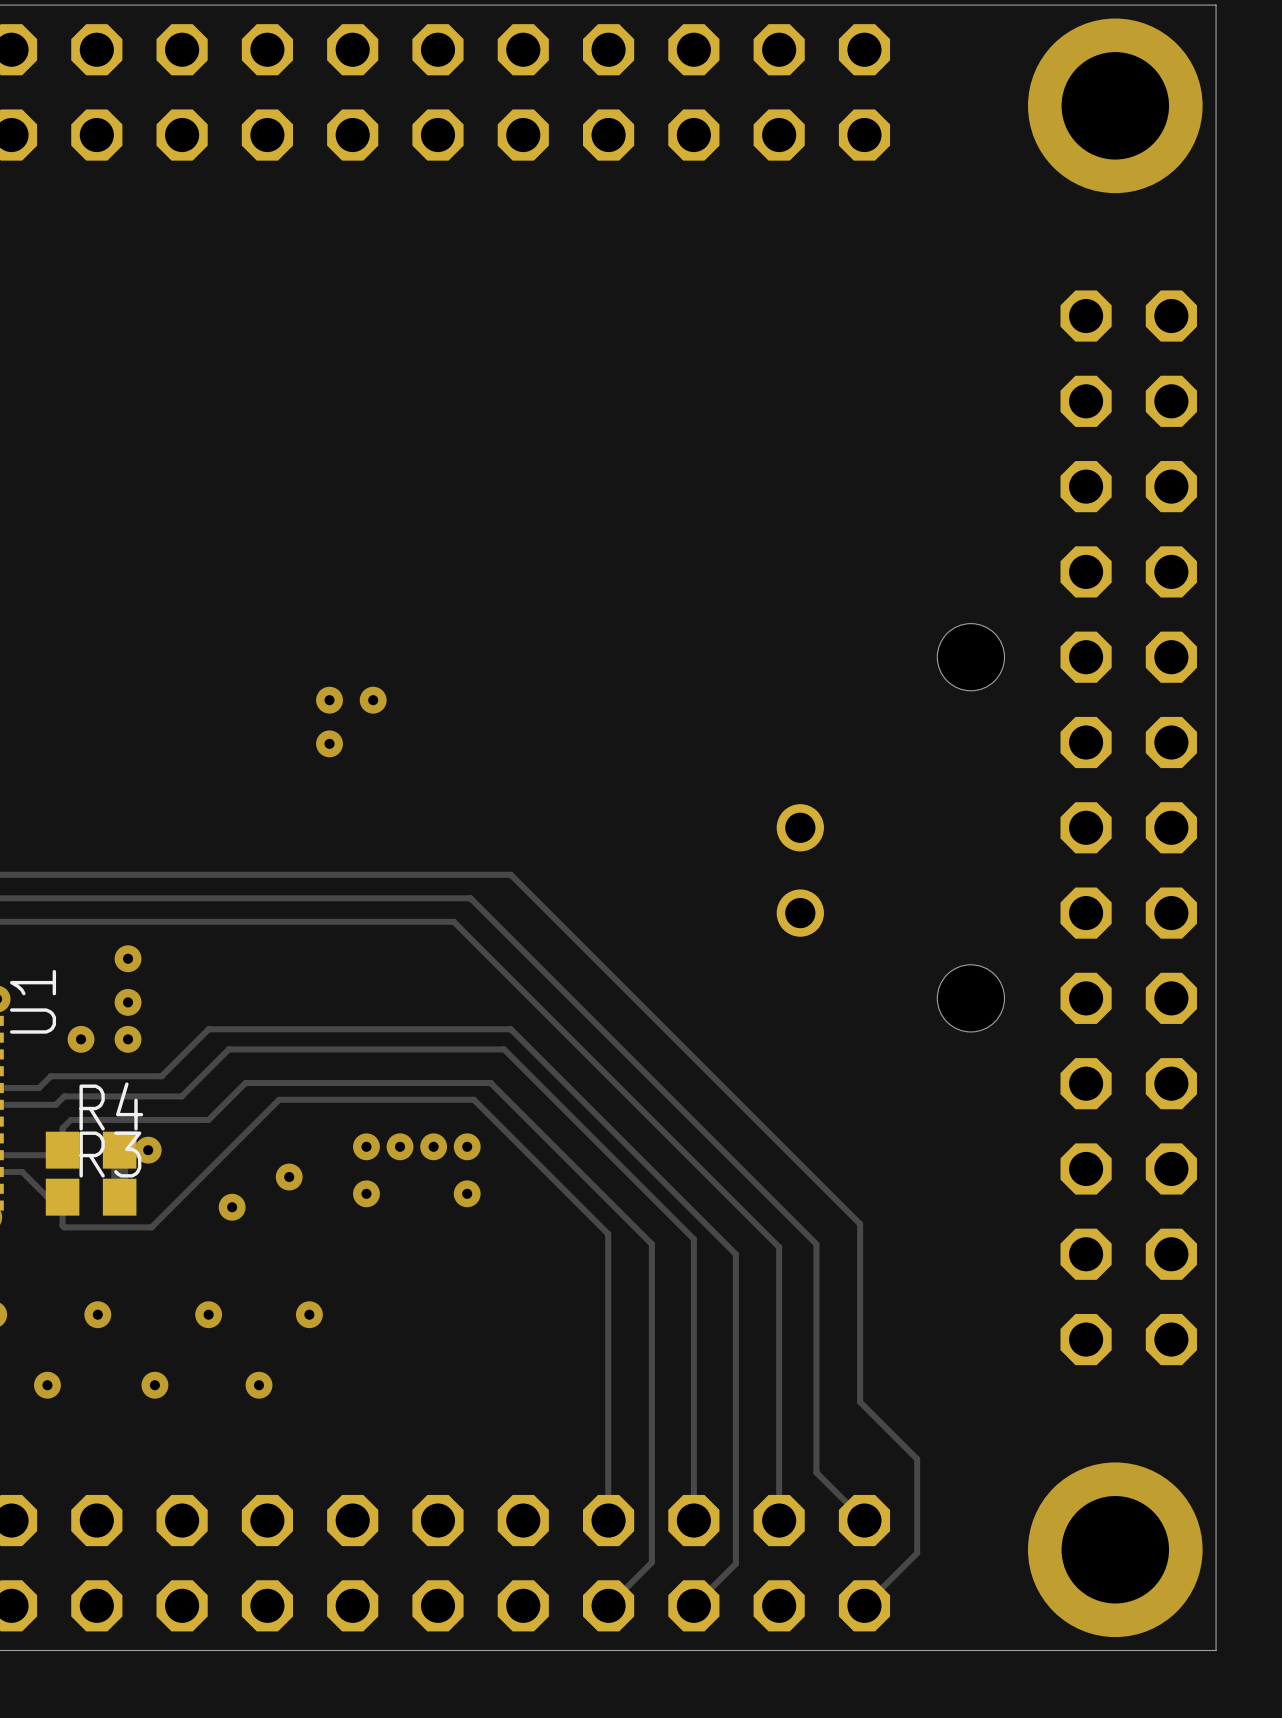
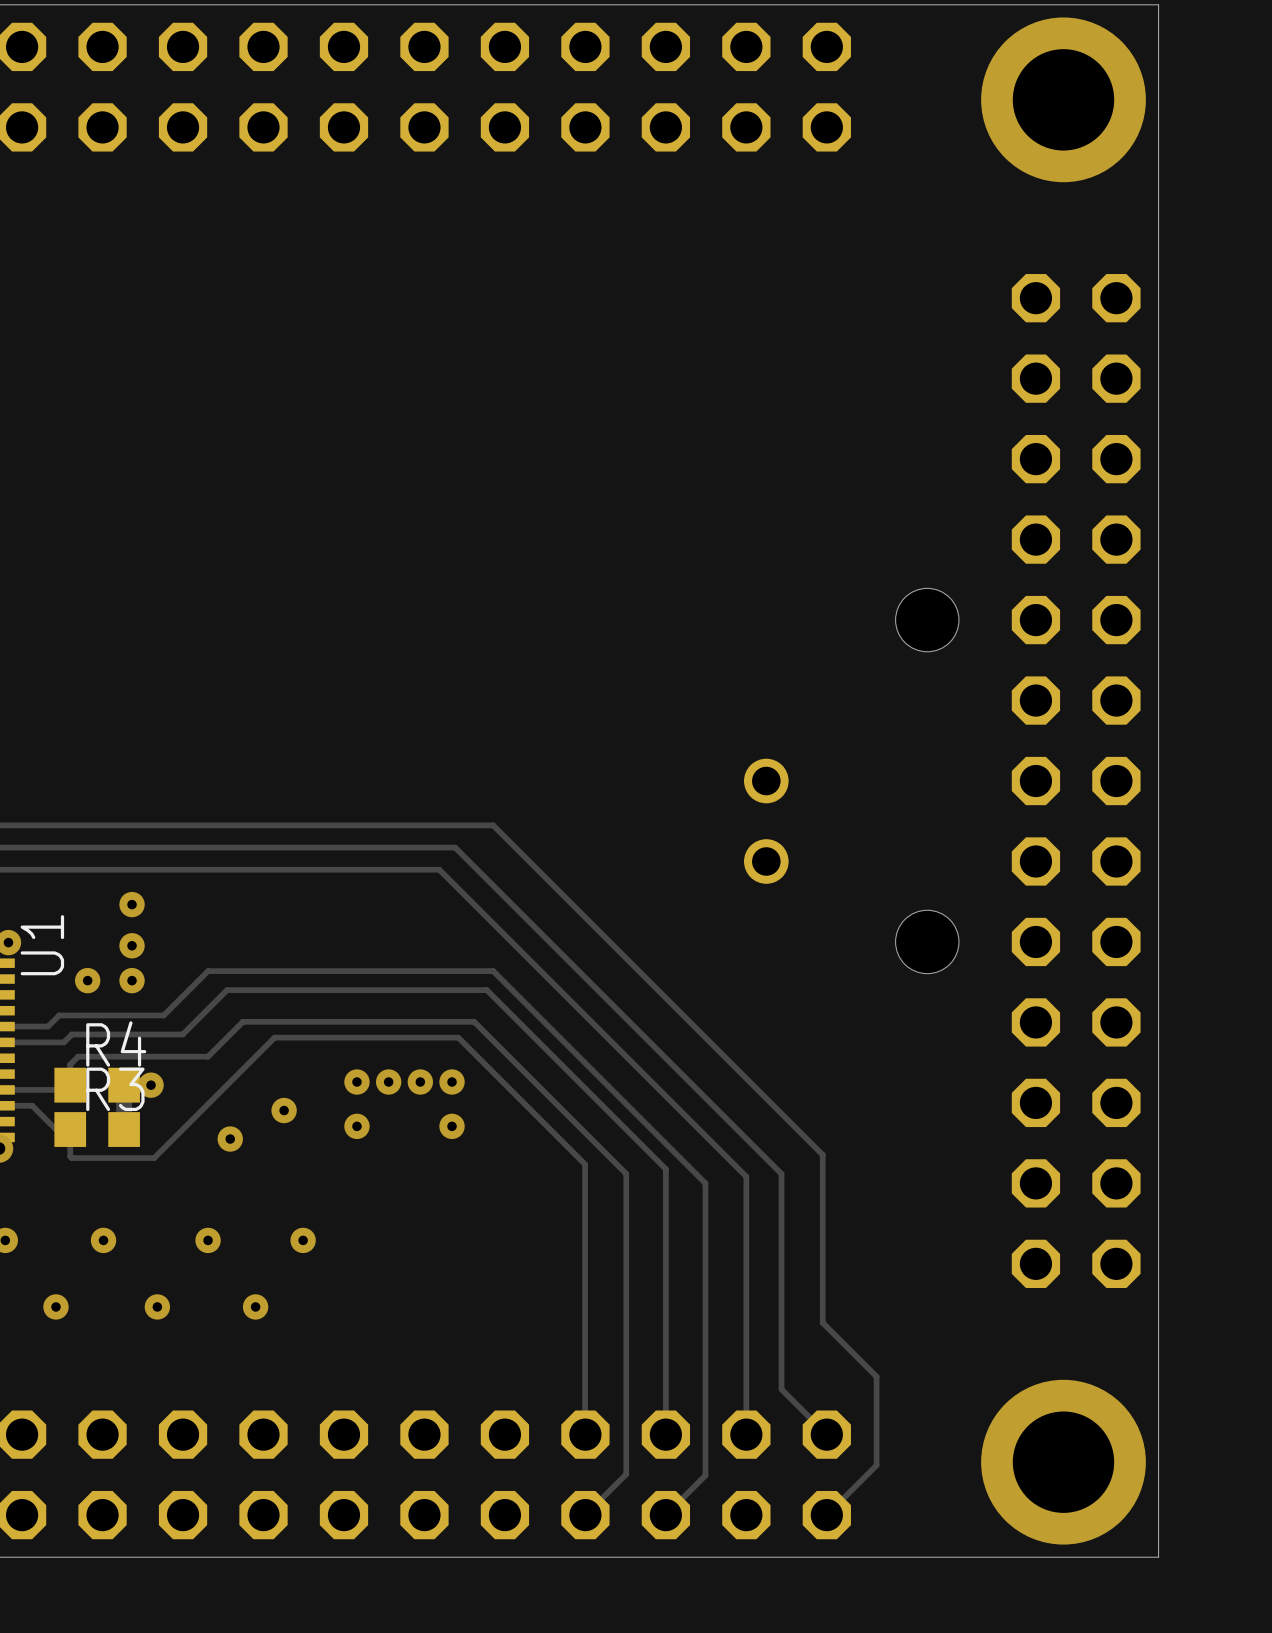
via: (329, 700) -> none
via: (373, 700) -> none
via: (329, 743) -> none

